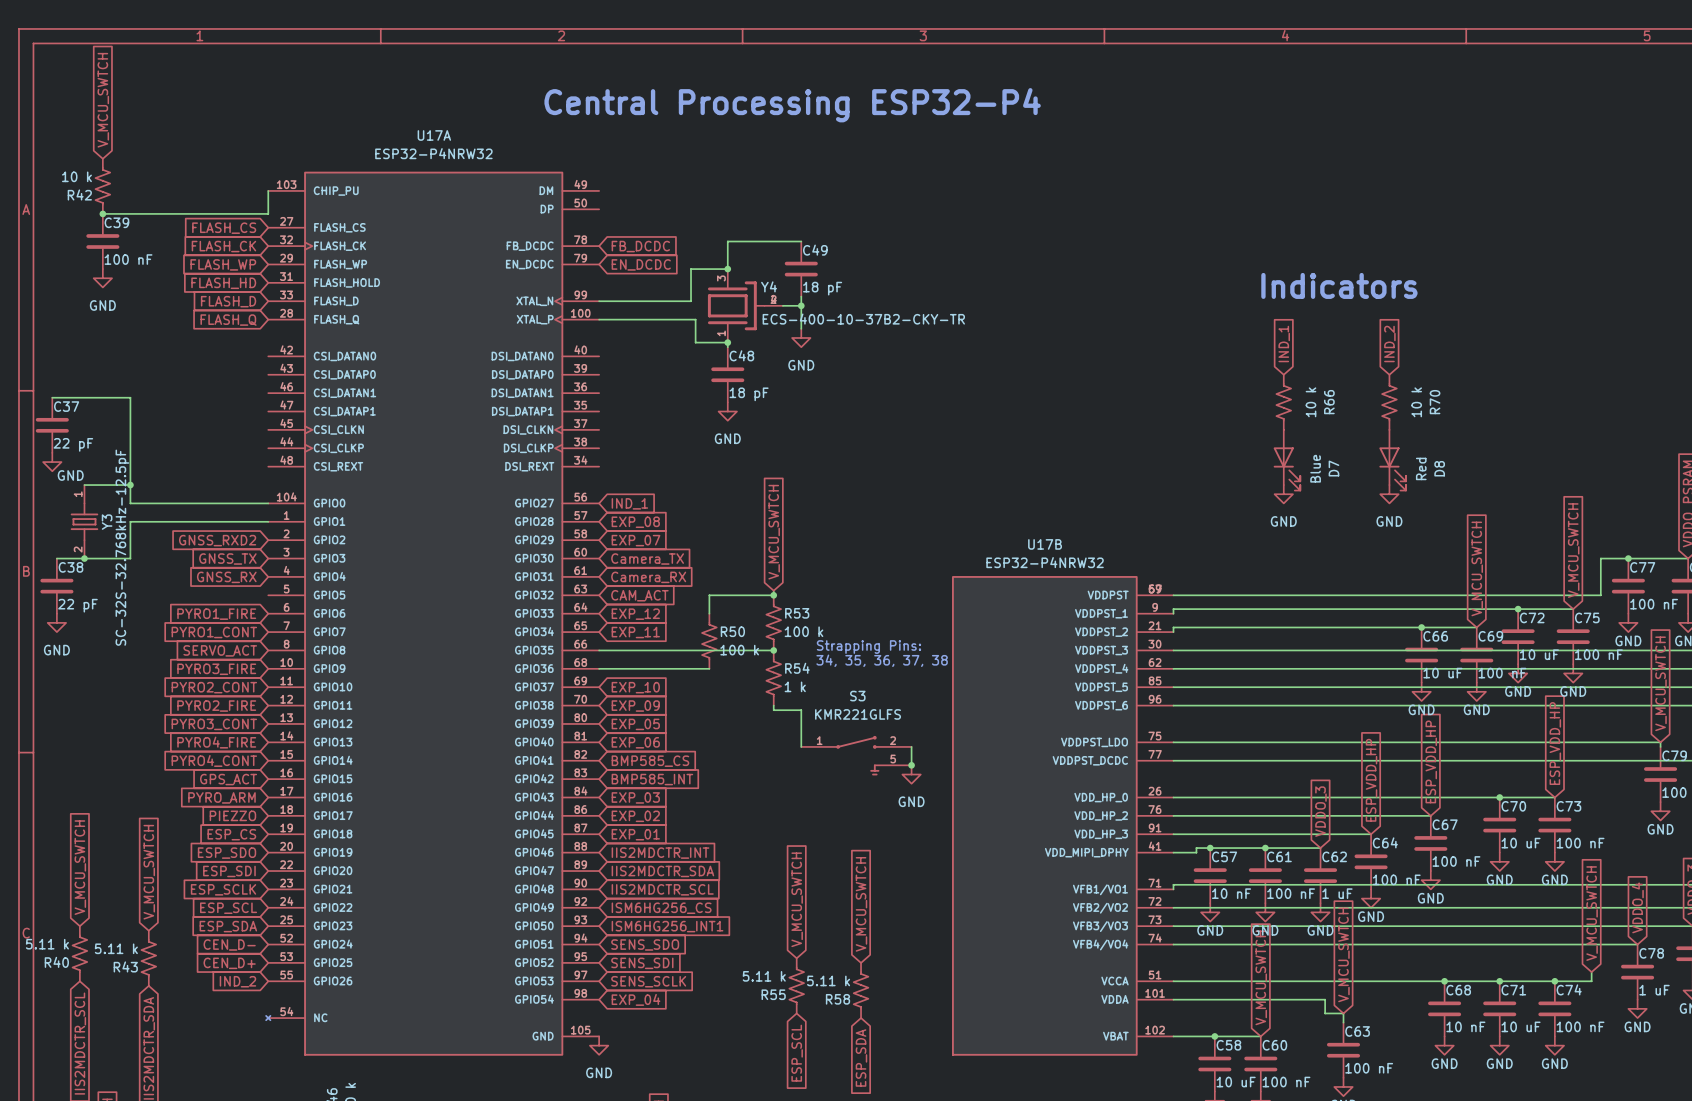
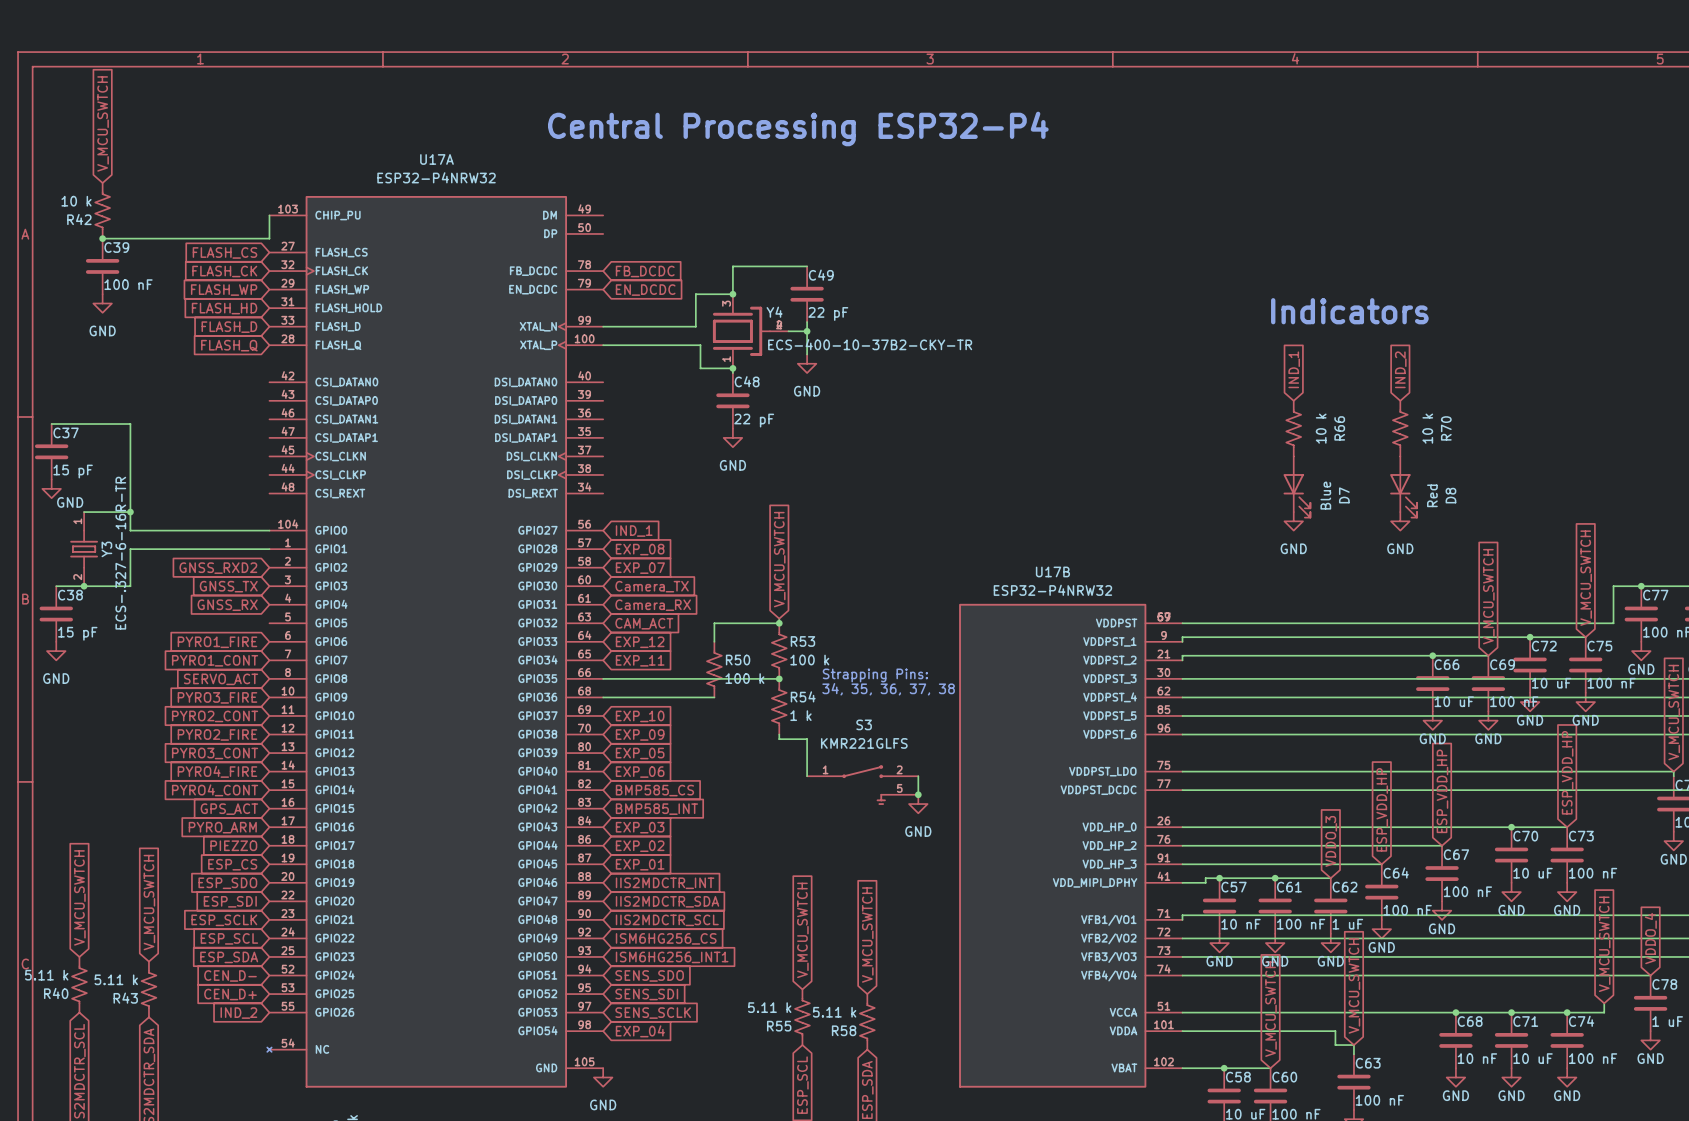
C49 value: 18 pF (822, 288) -> 22 pF (828, 313)
C48 value: 18 pF (749, 394) -> 22 pF (754, 420)
C37 value: 22 pF (73, 444) -> 15 pF (73, 471)
Y3 value: SC-32S-32.768kHz-12.5pF (122, 547) -> ECS-.327-6-16R-TR (120, 553)
C38 value: 22 pF (77, 605) -> 15 pF (77, 633)

